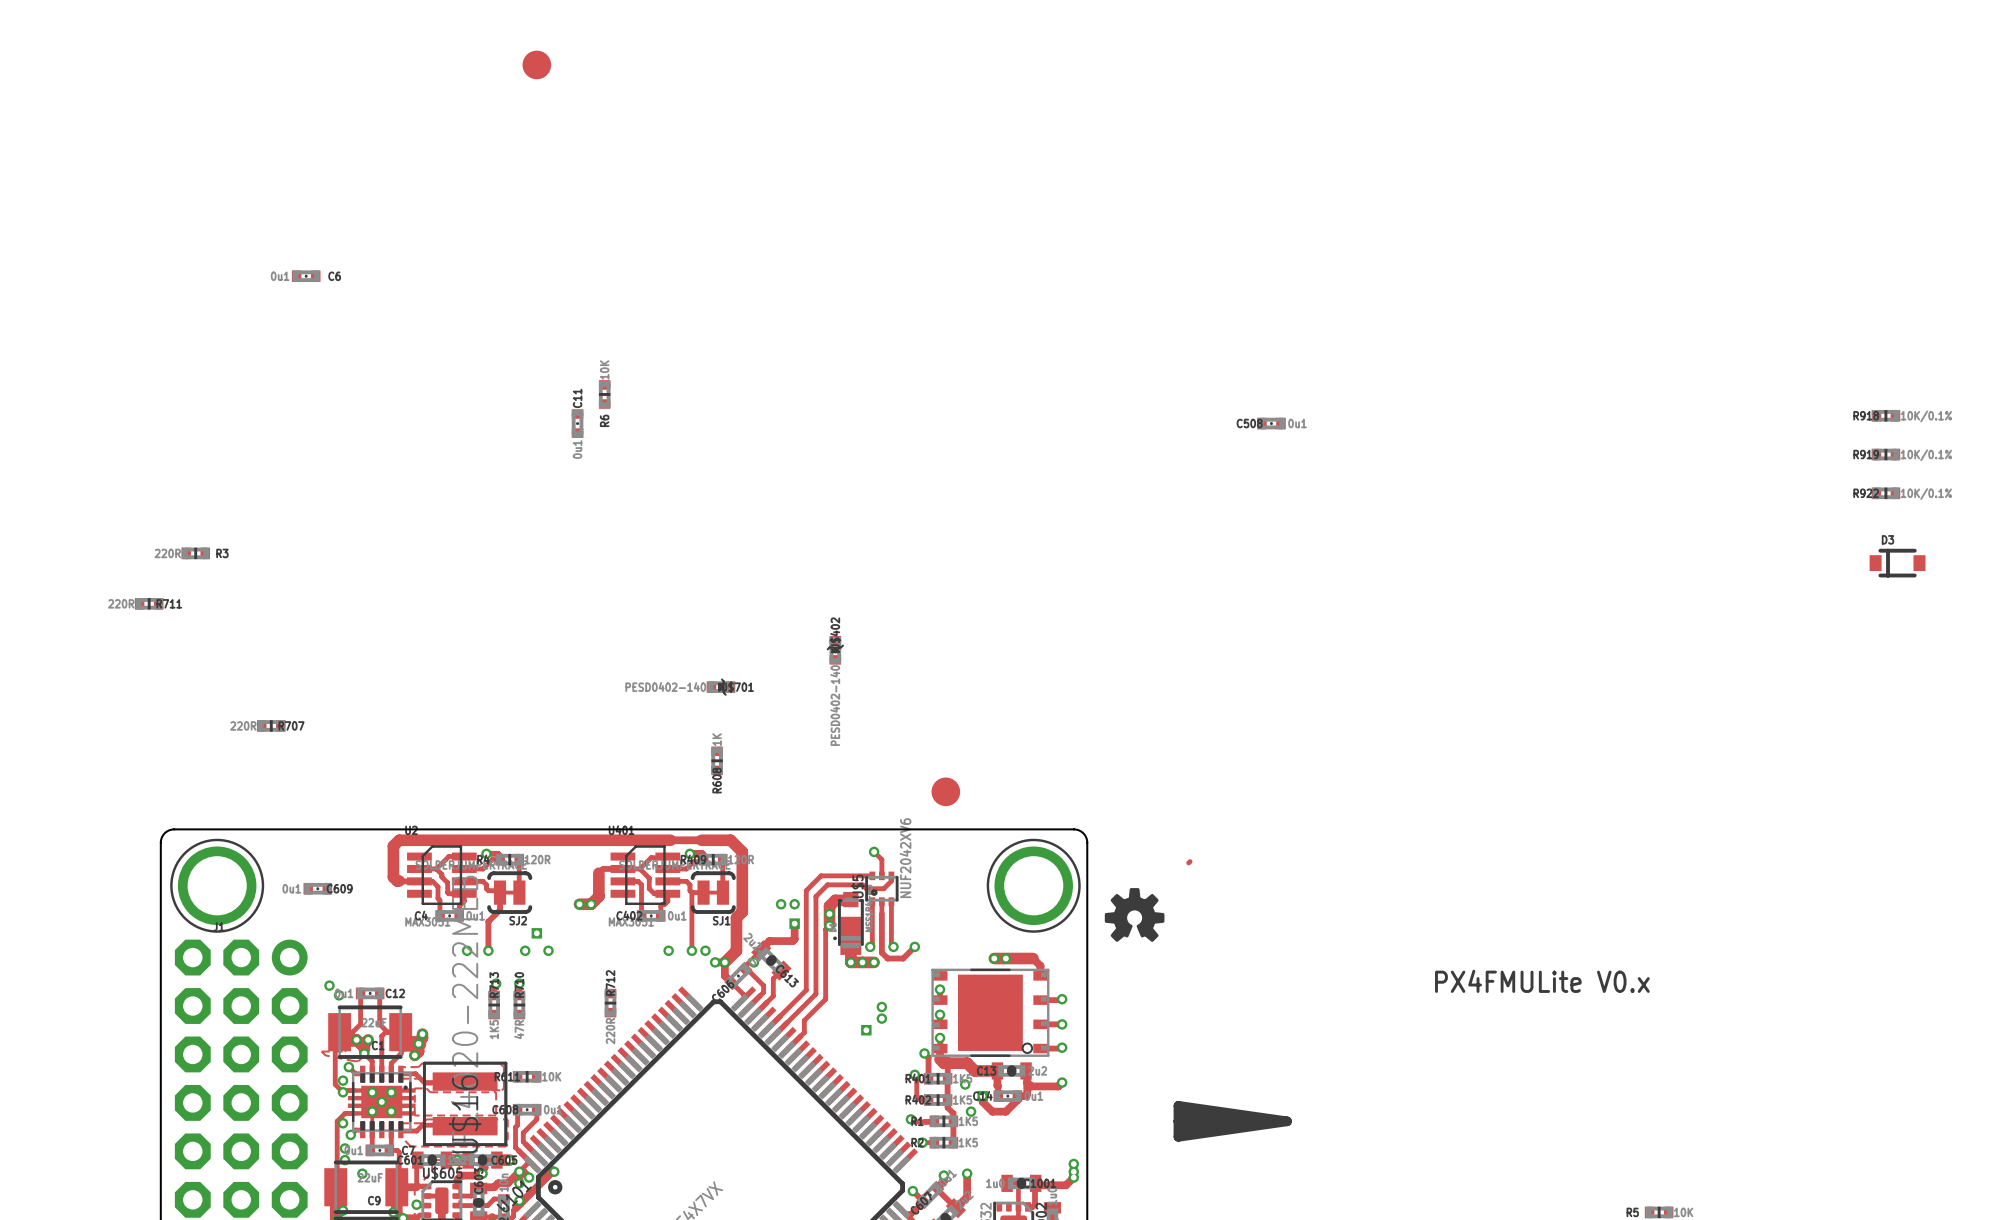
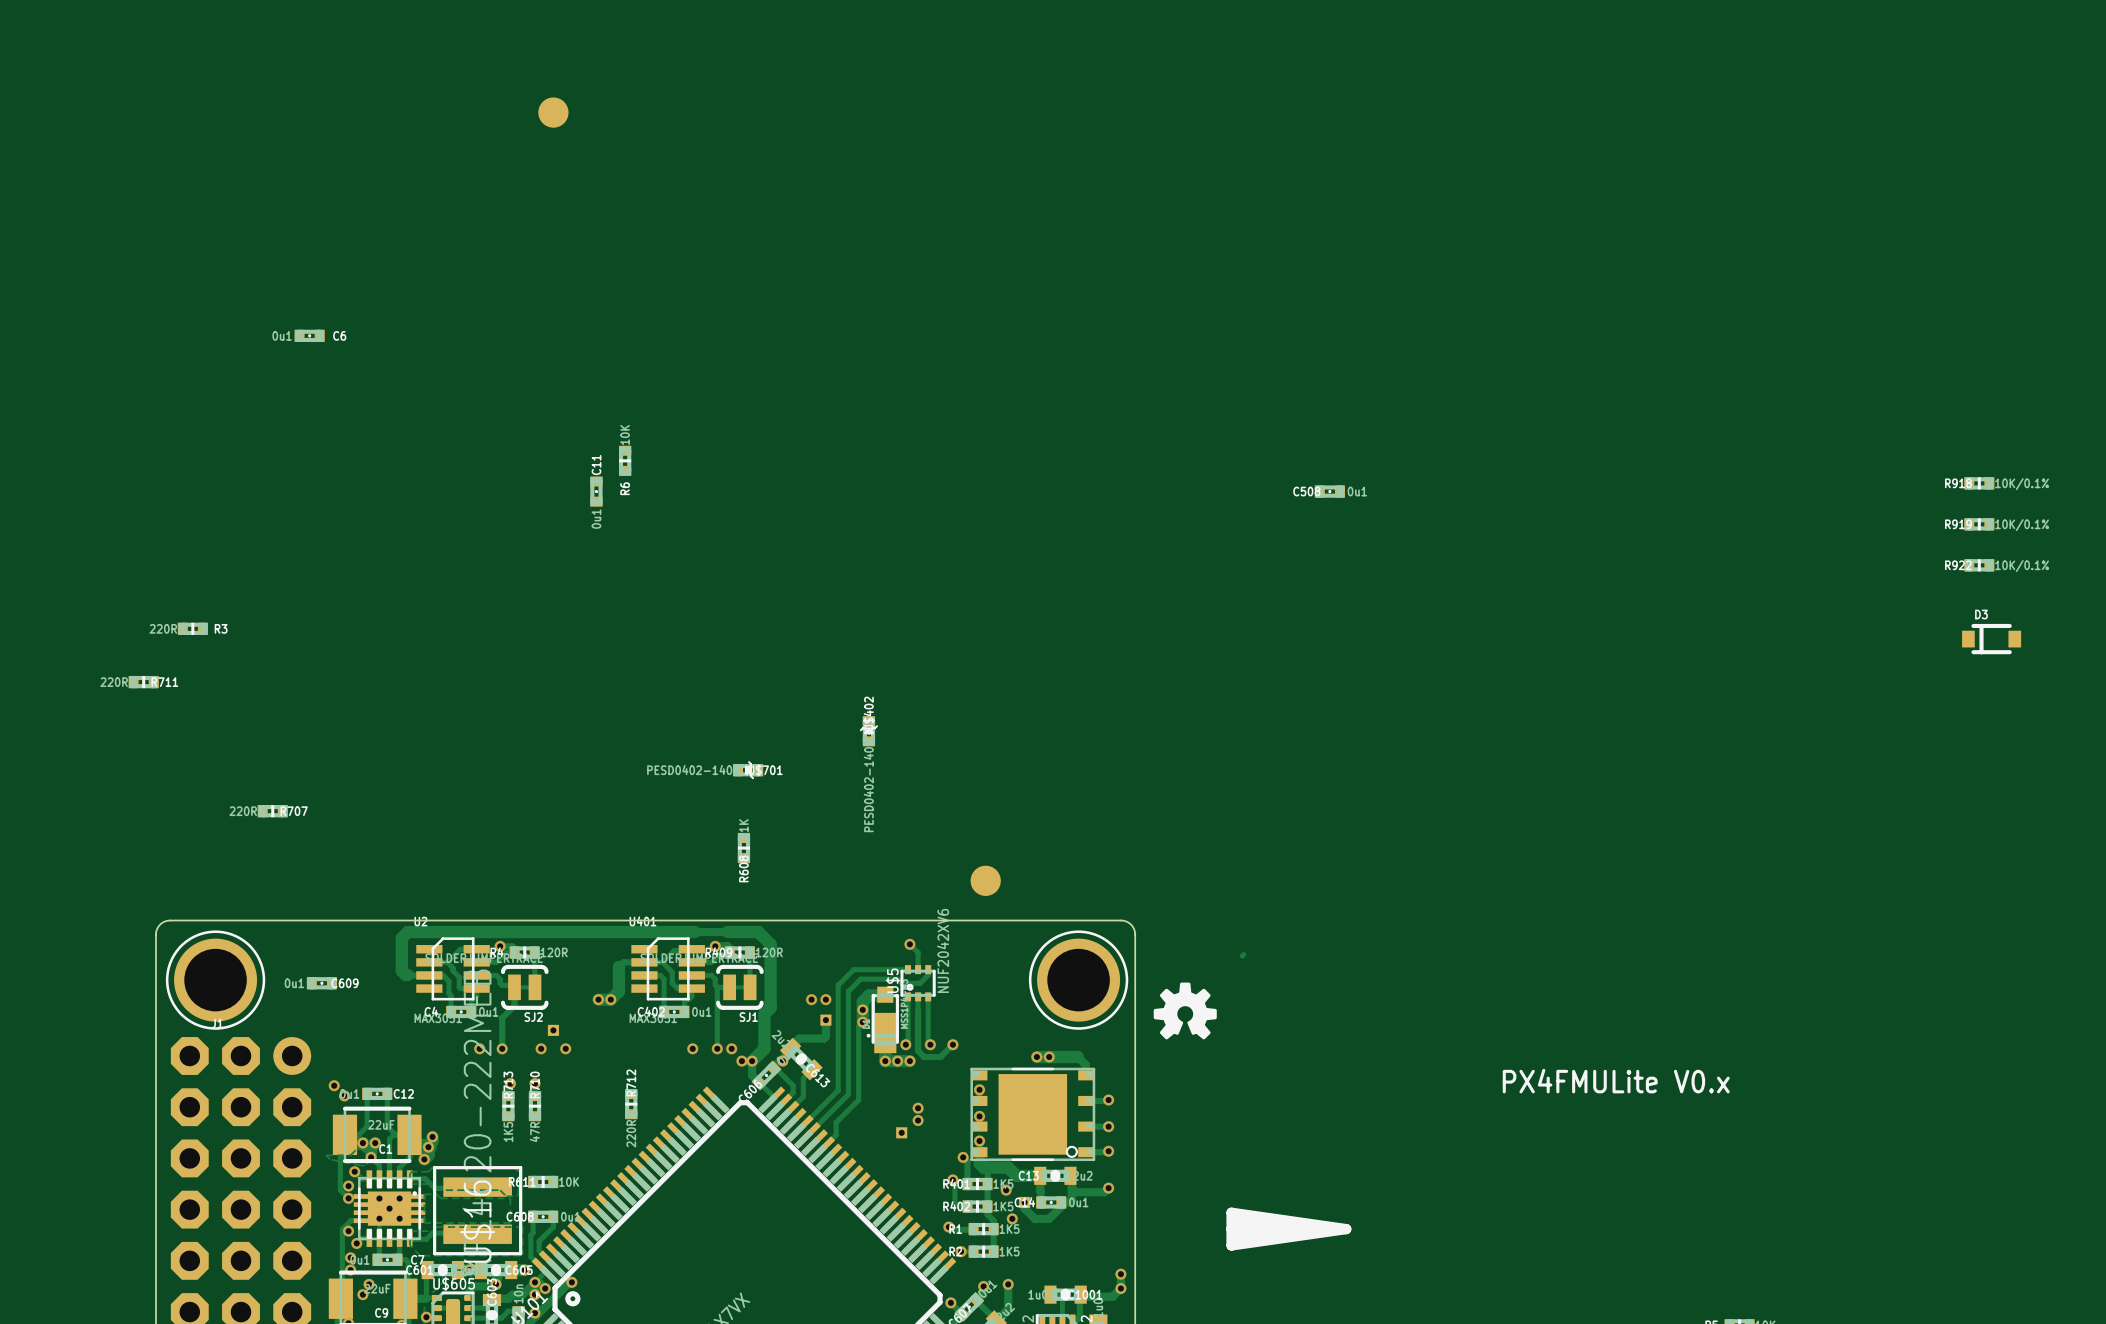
via: (1073, 1171) -> none
via: none -> (362, 1294)

